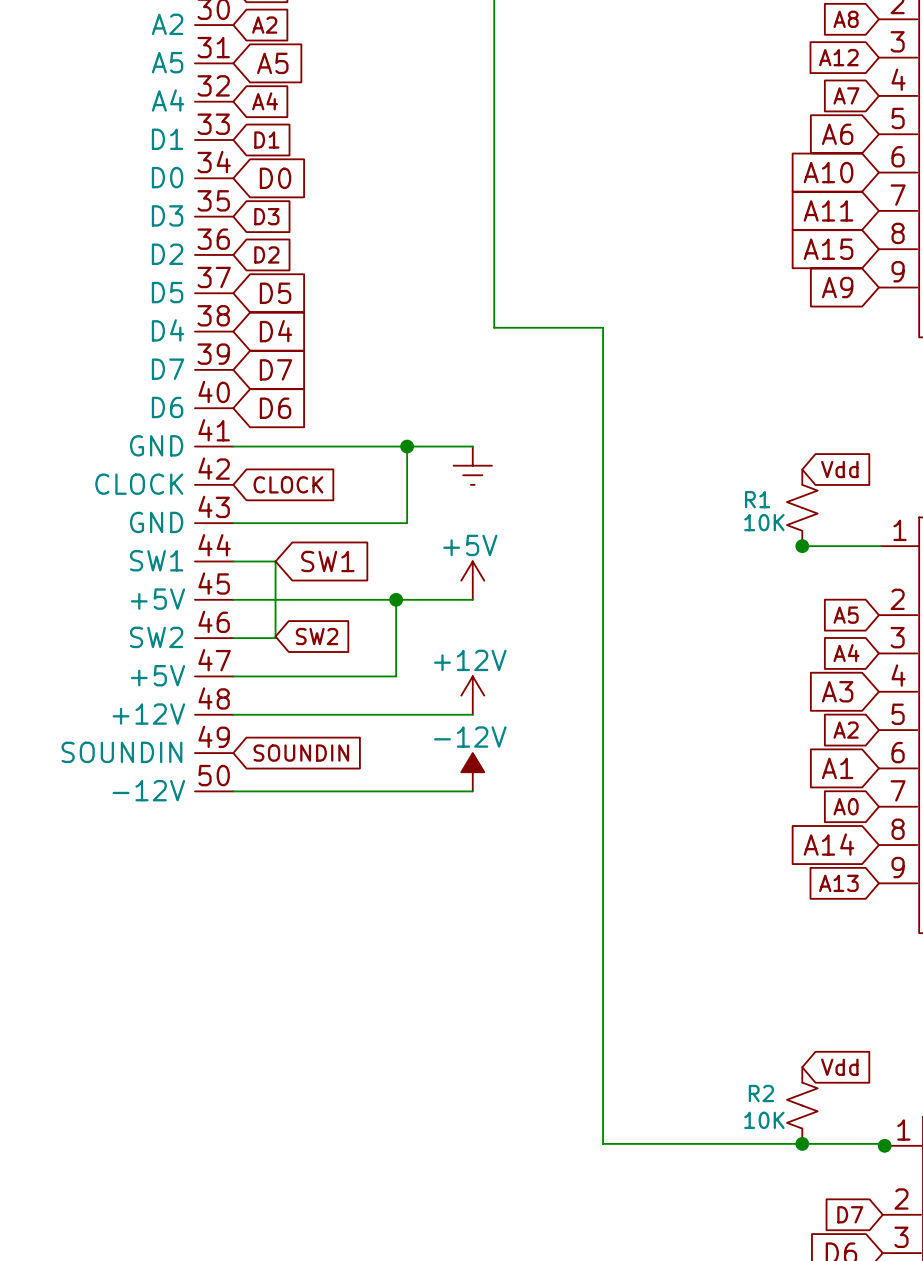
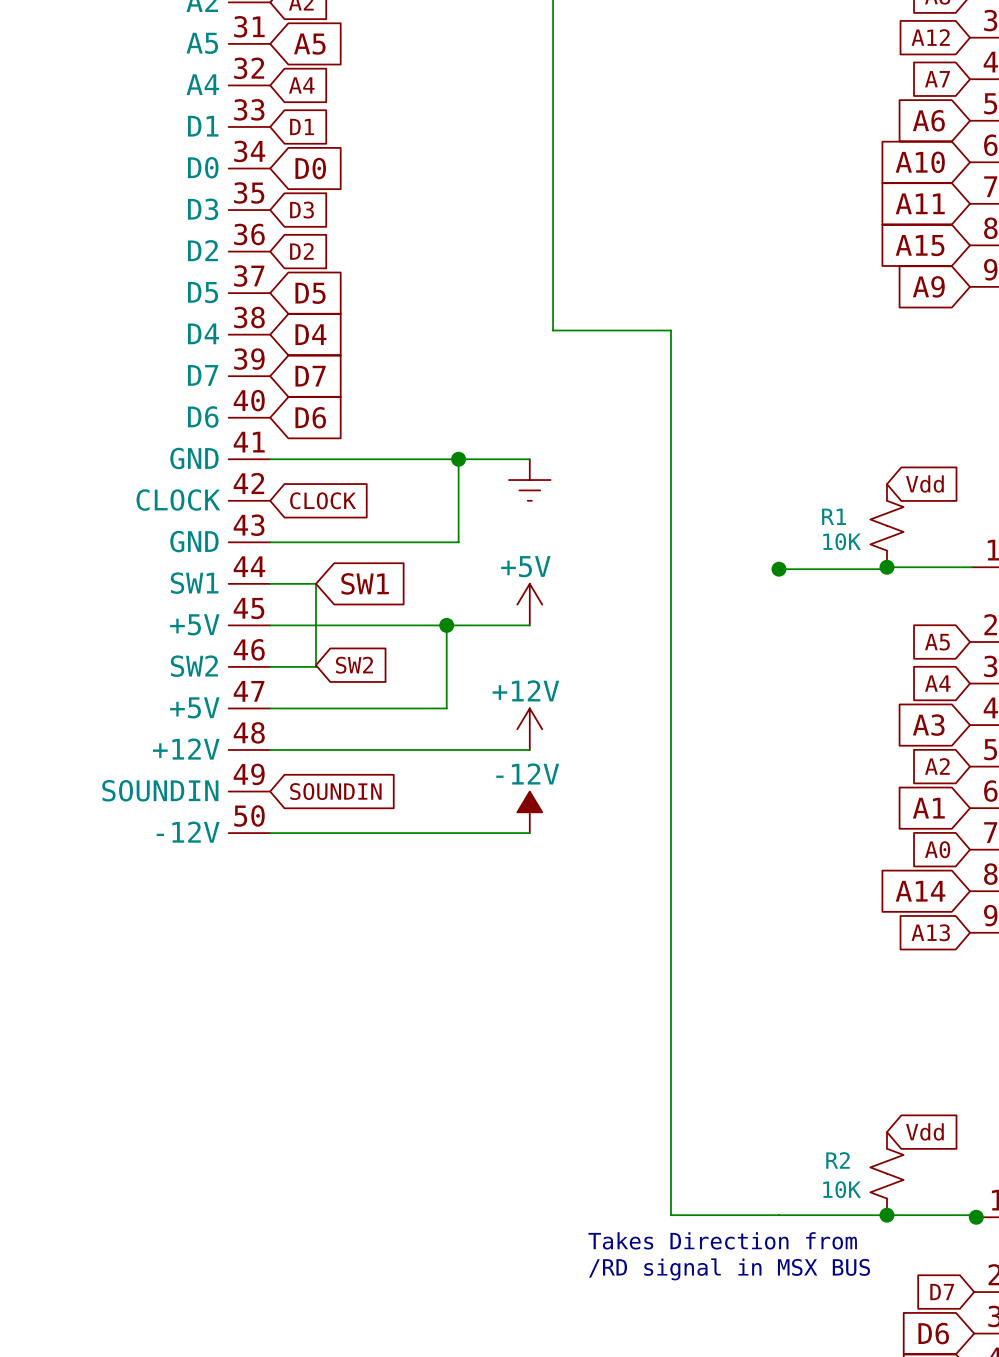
wire: none -> (778, 569) (886, 569)
junction: none -> (778, 569)
text: none -> Takes Direction from (722, 1240)
text: none -> /RD signal in MSX BUS (729, 1269)

